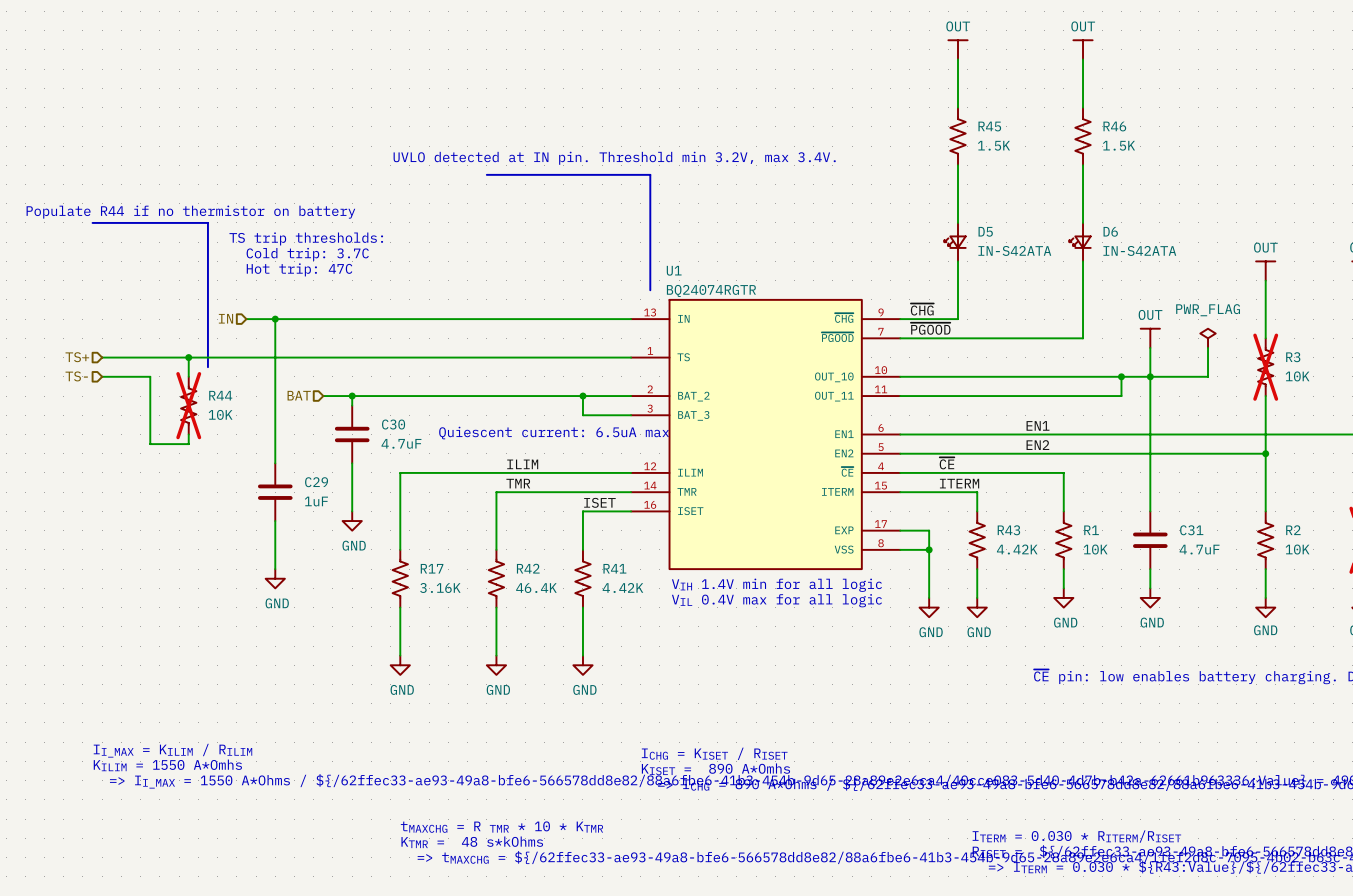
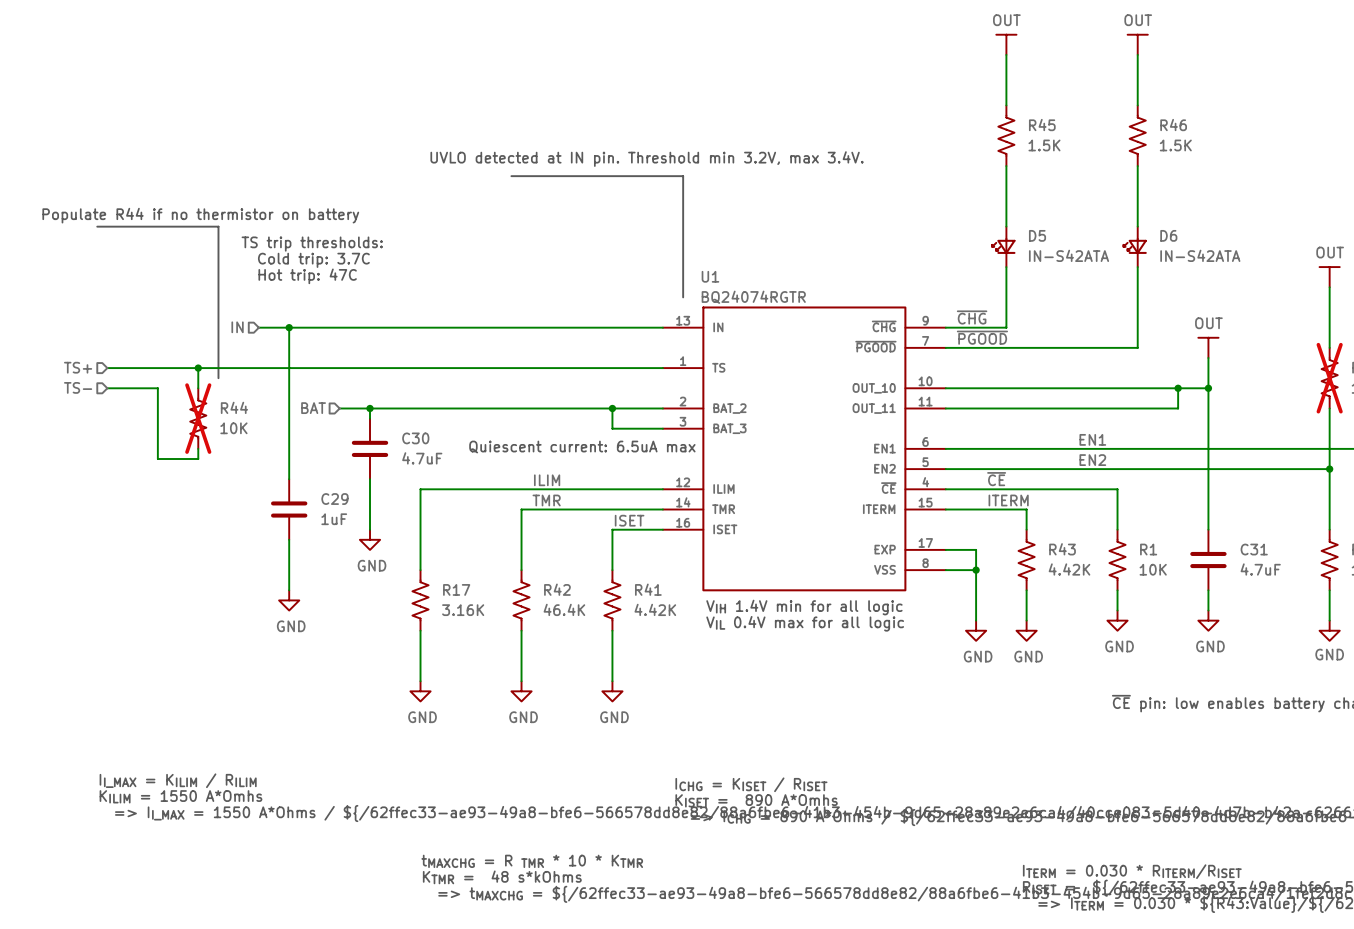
power symbol: PWR_FLAG (1208, 338) -> none
wire: (1208, 347) (1208, 376) (1150, 376) -> none

